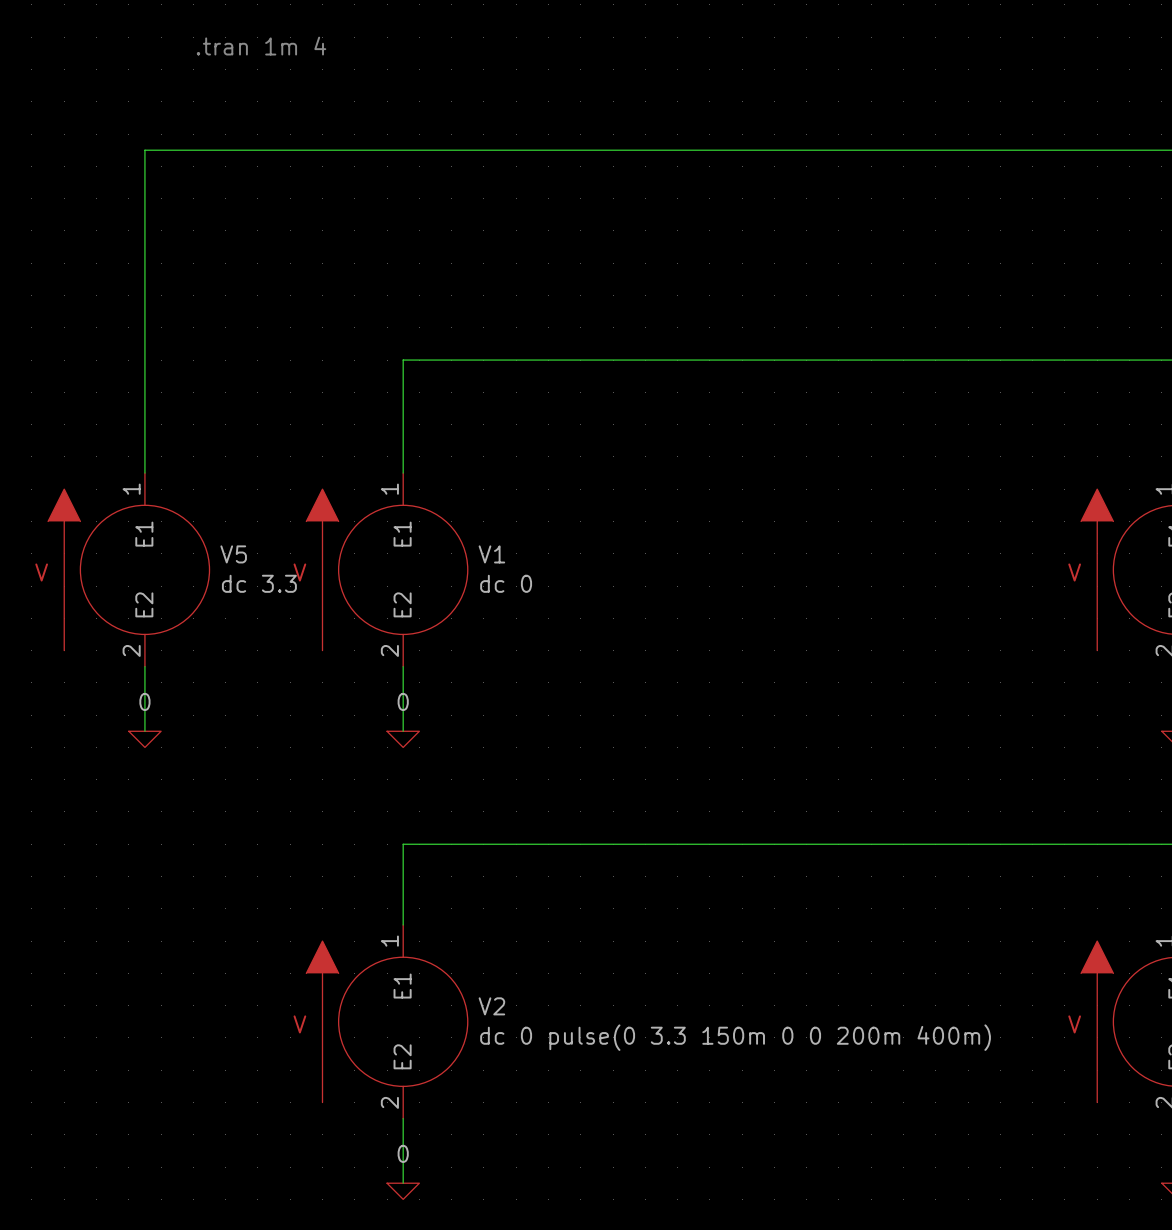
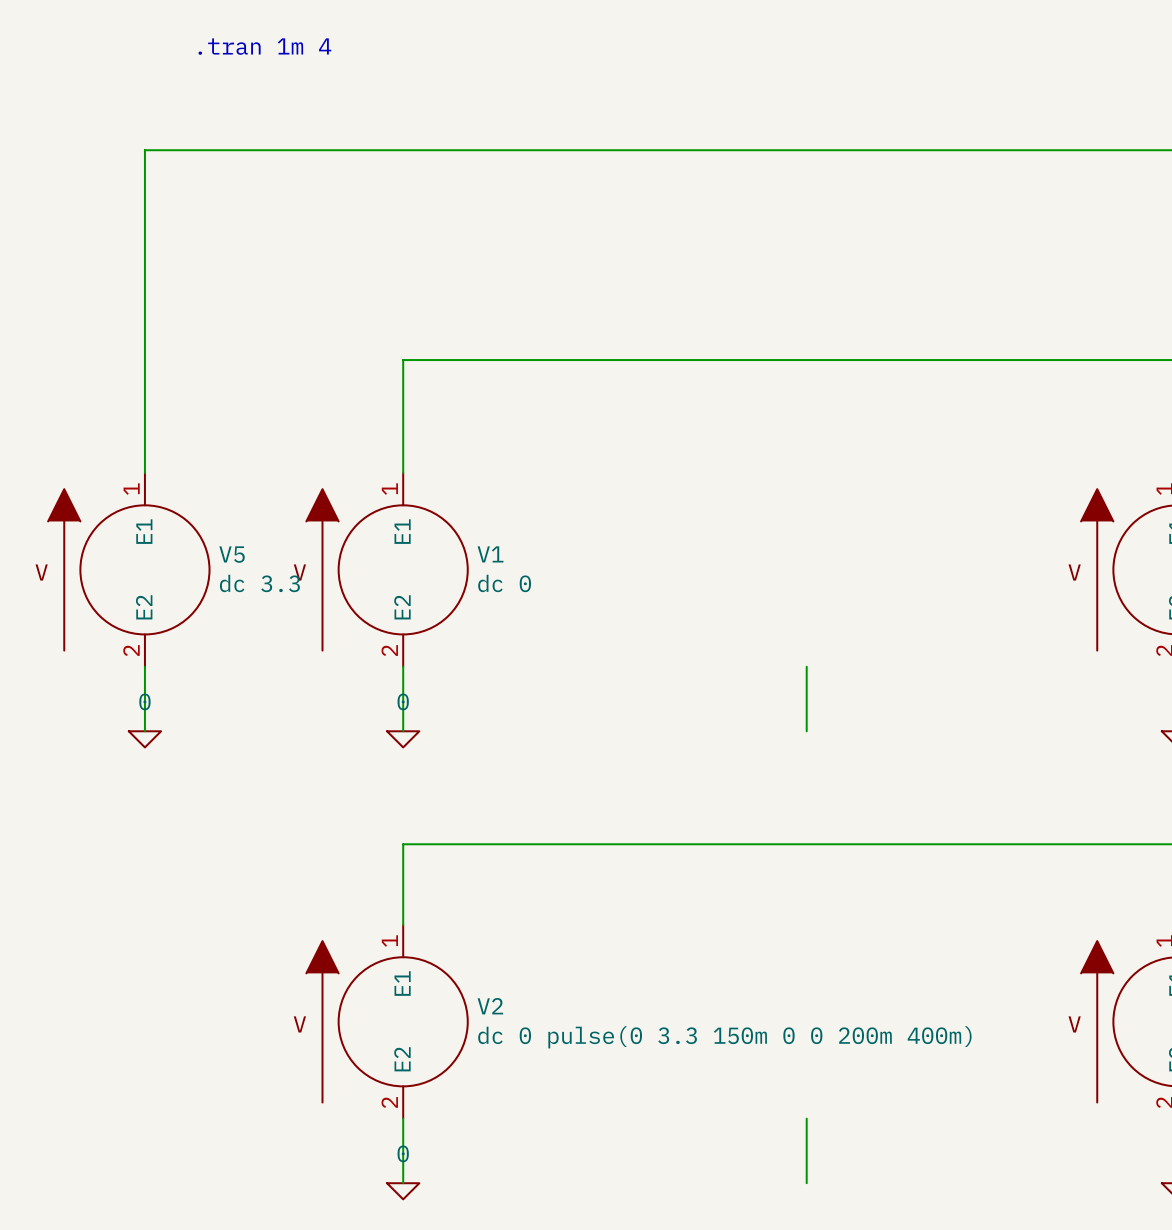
wire: none -> (806, 666) (806, 731)
wire: none -> (806, 1118) (806, 1183)

